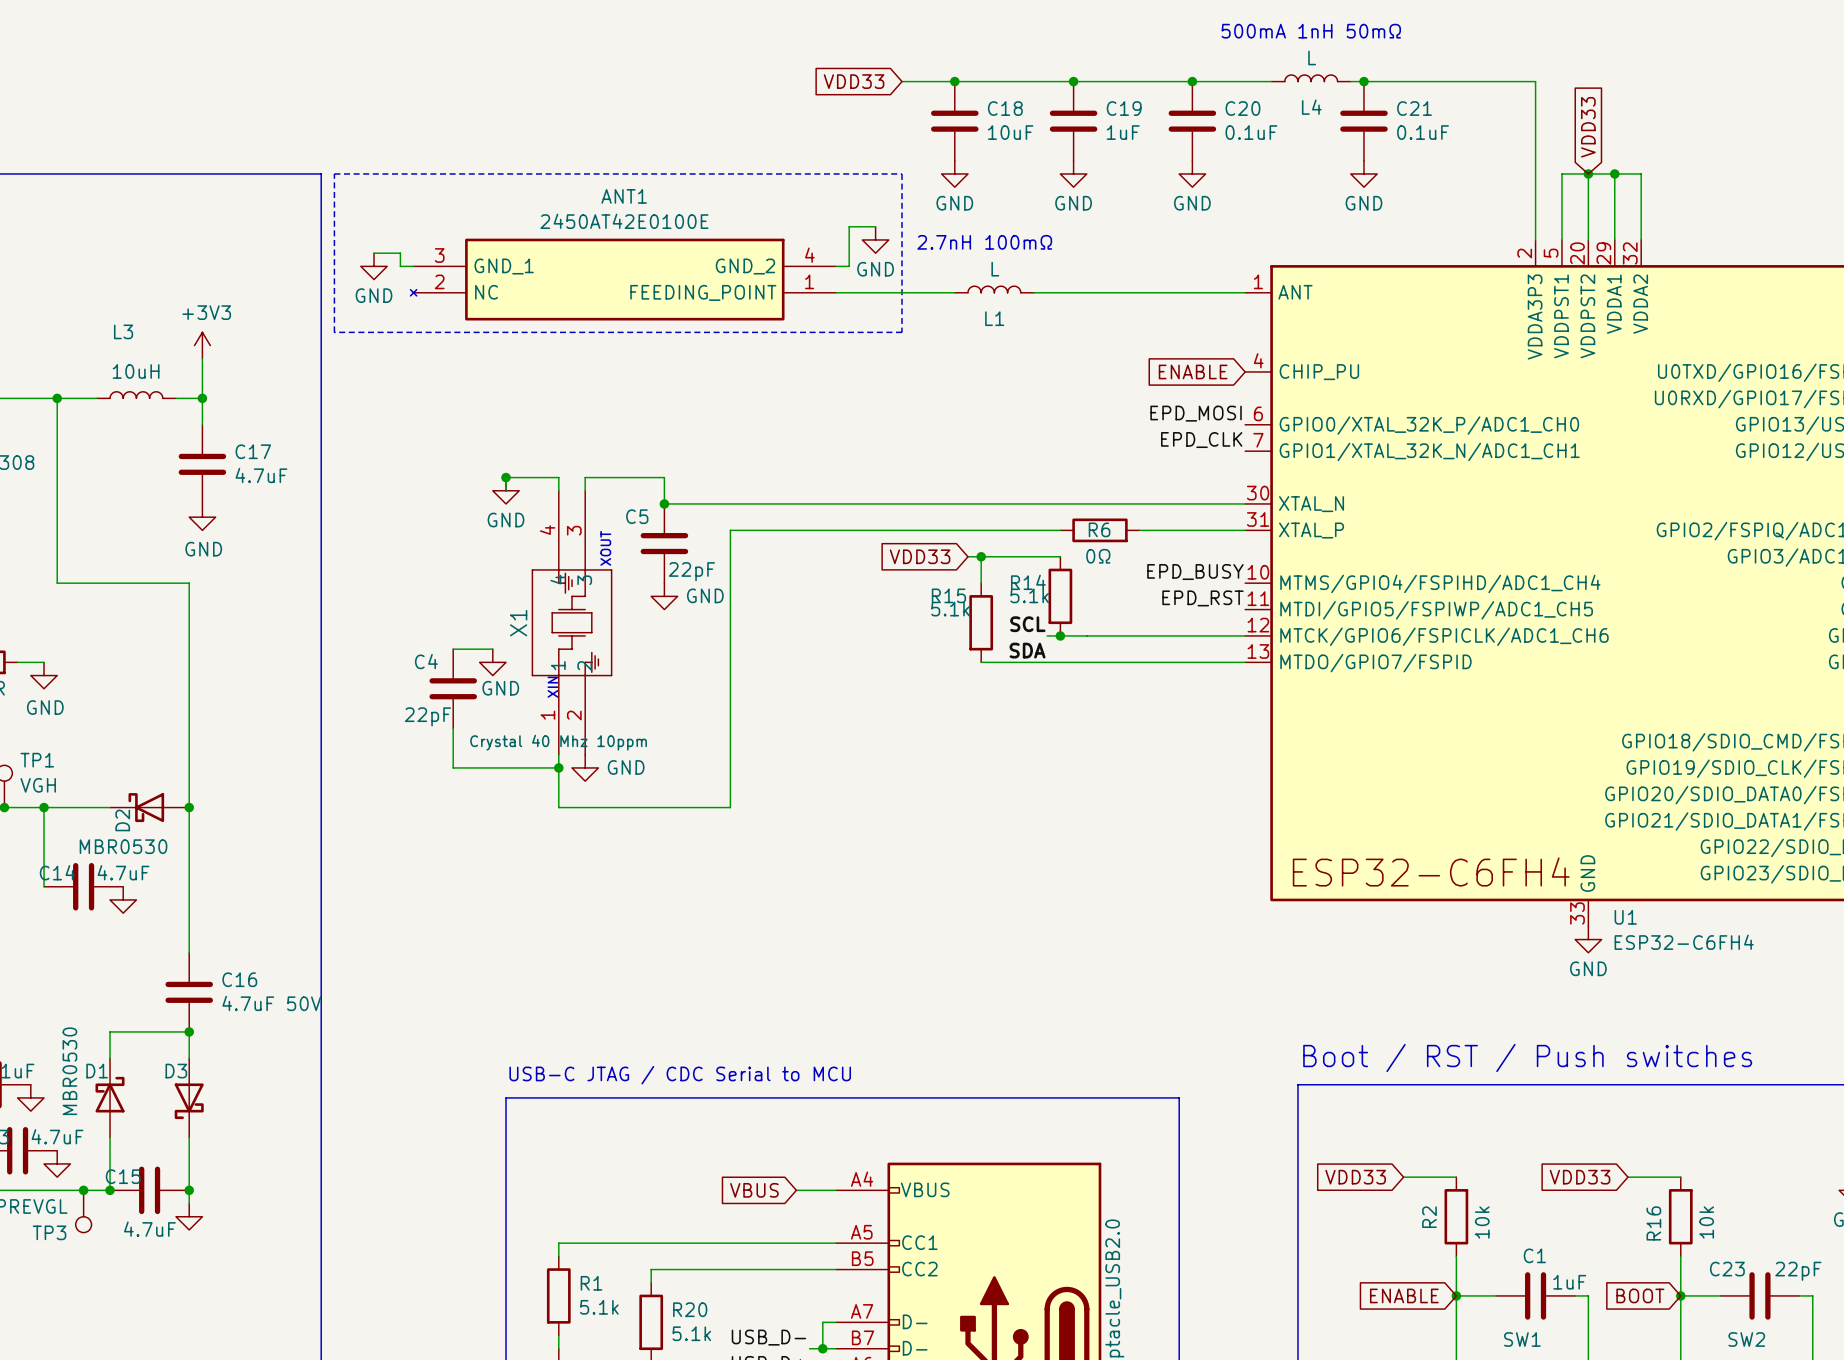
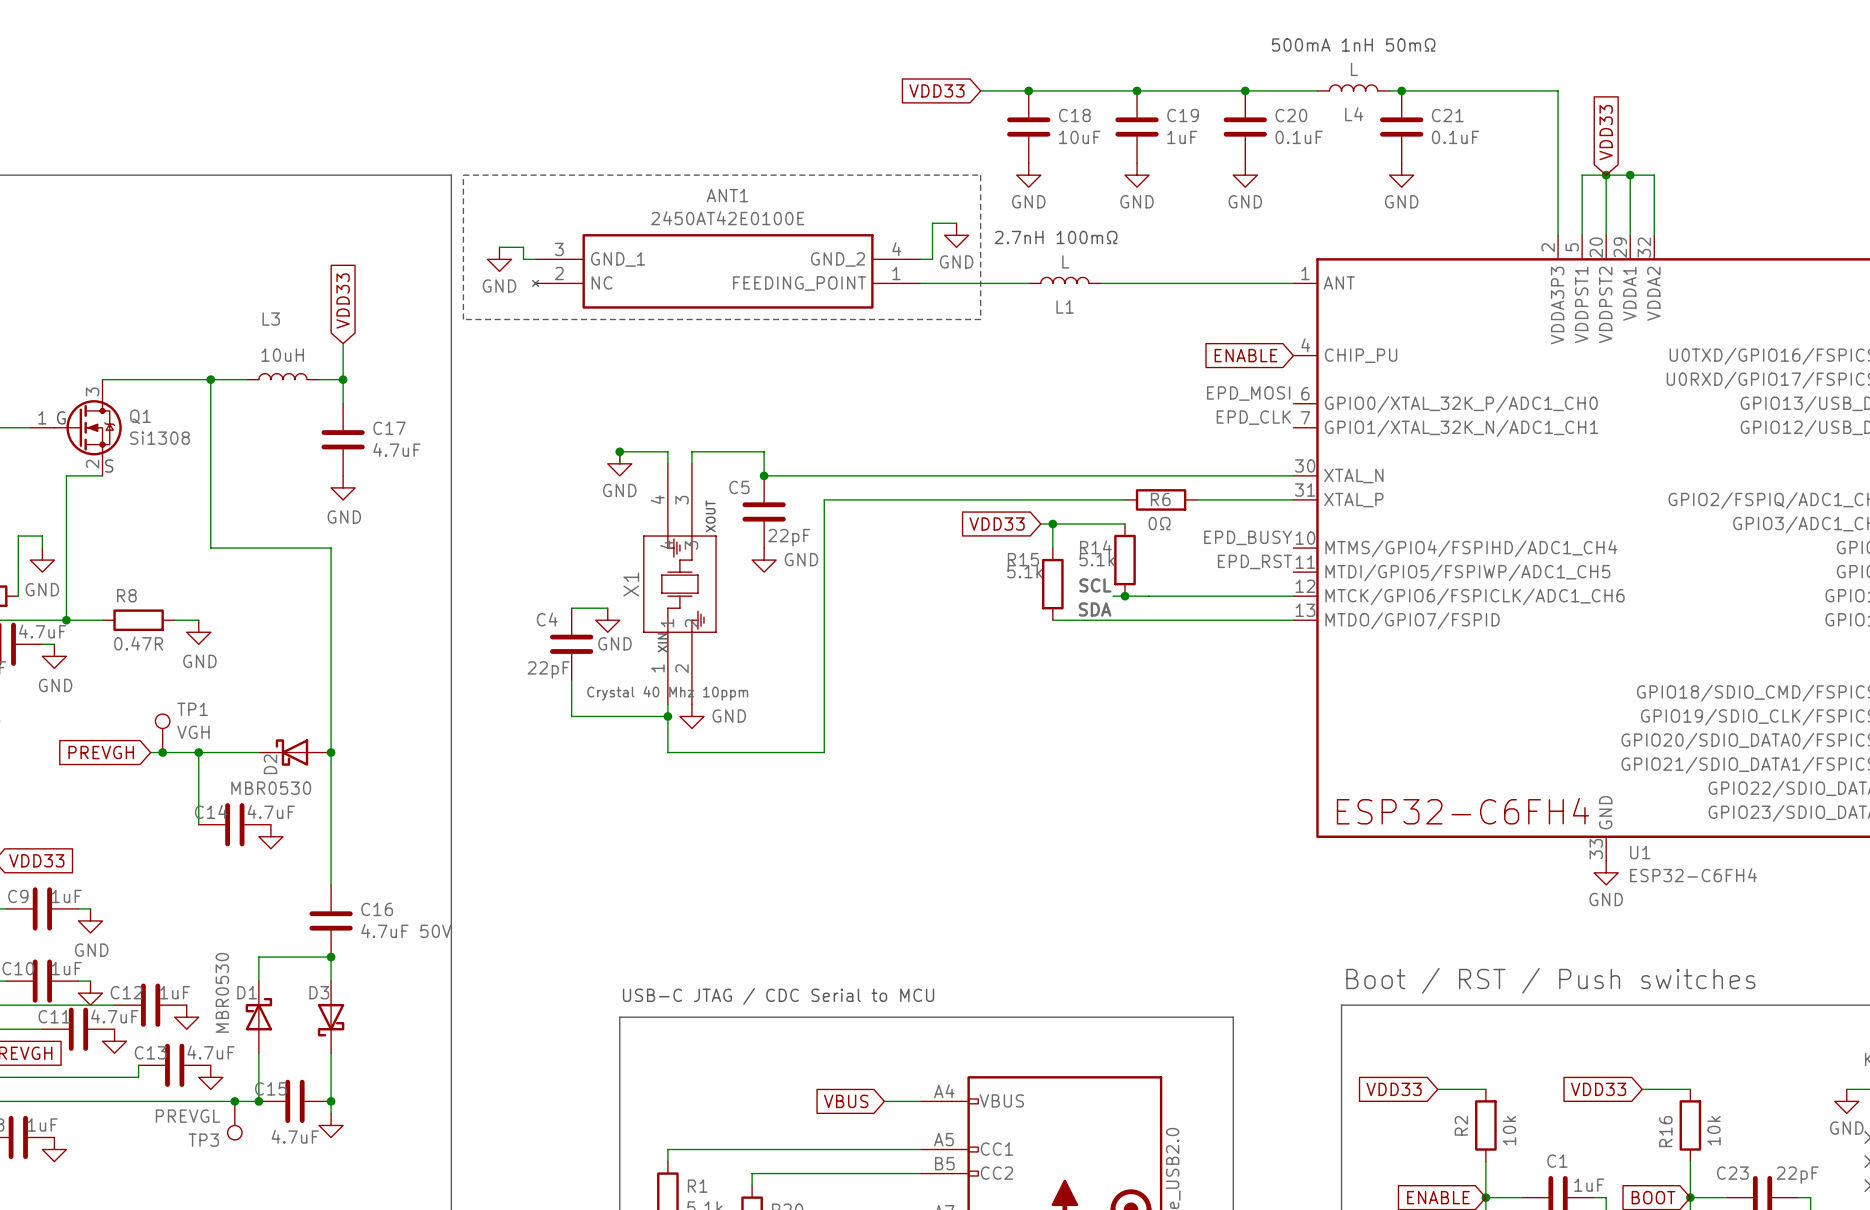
global label: none -> VDD33 (343, 301)
power symbol: +3V3 (202, 345) -> none

